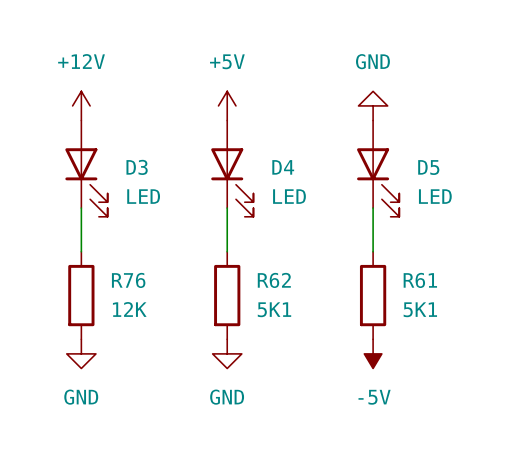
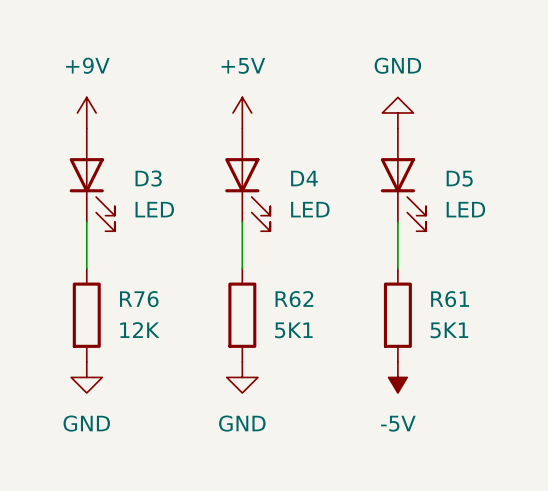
power symbol: +12V (81, 105) -> +9V (86, 112)

